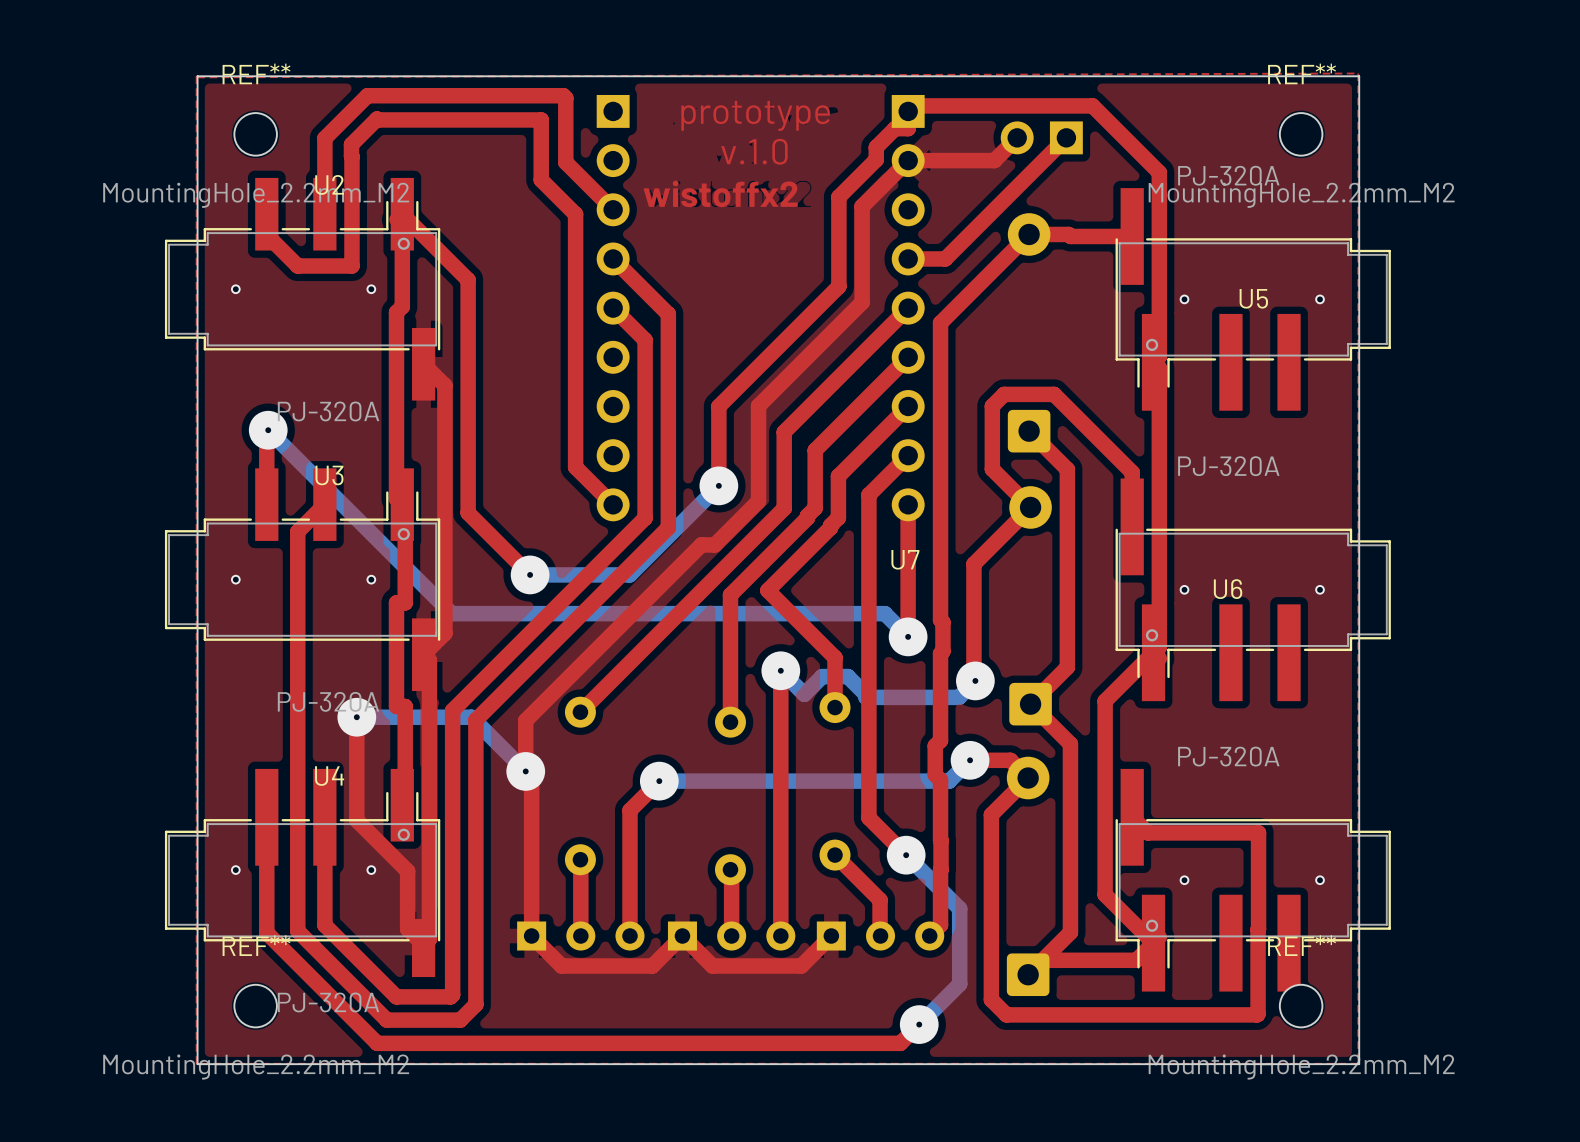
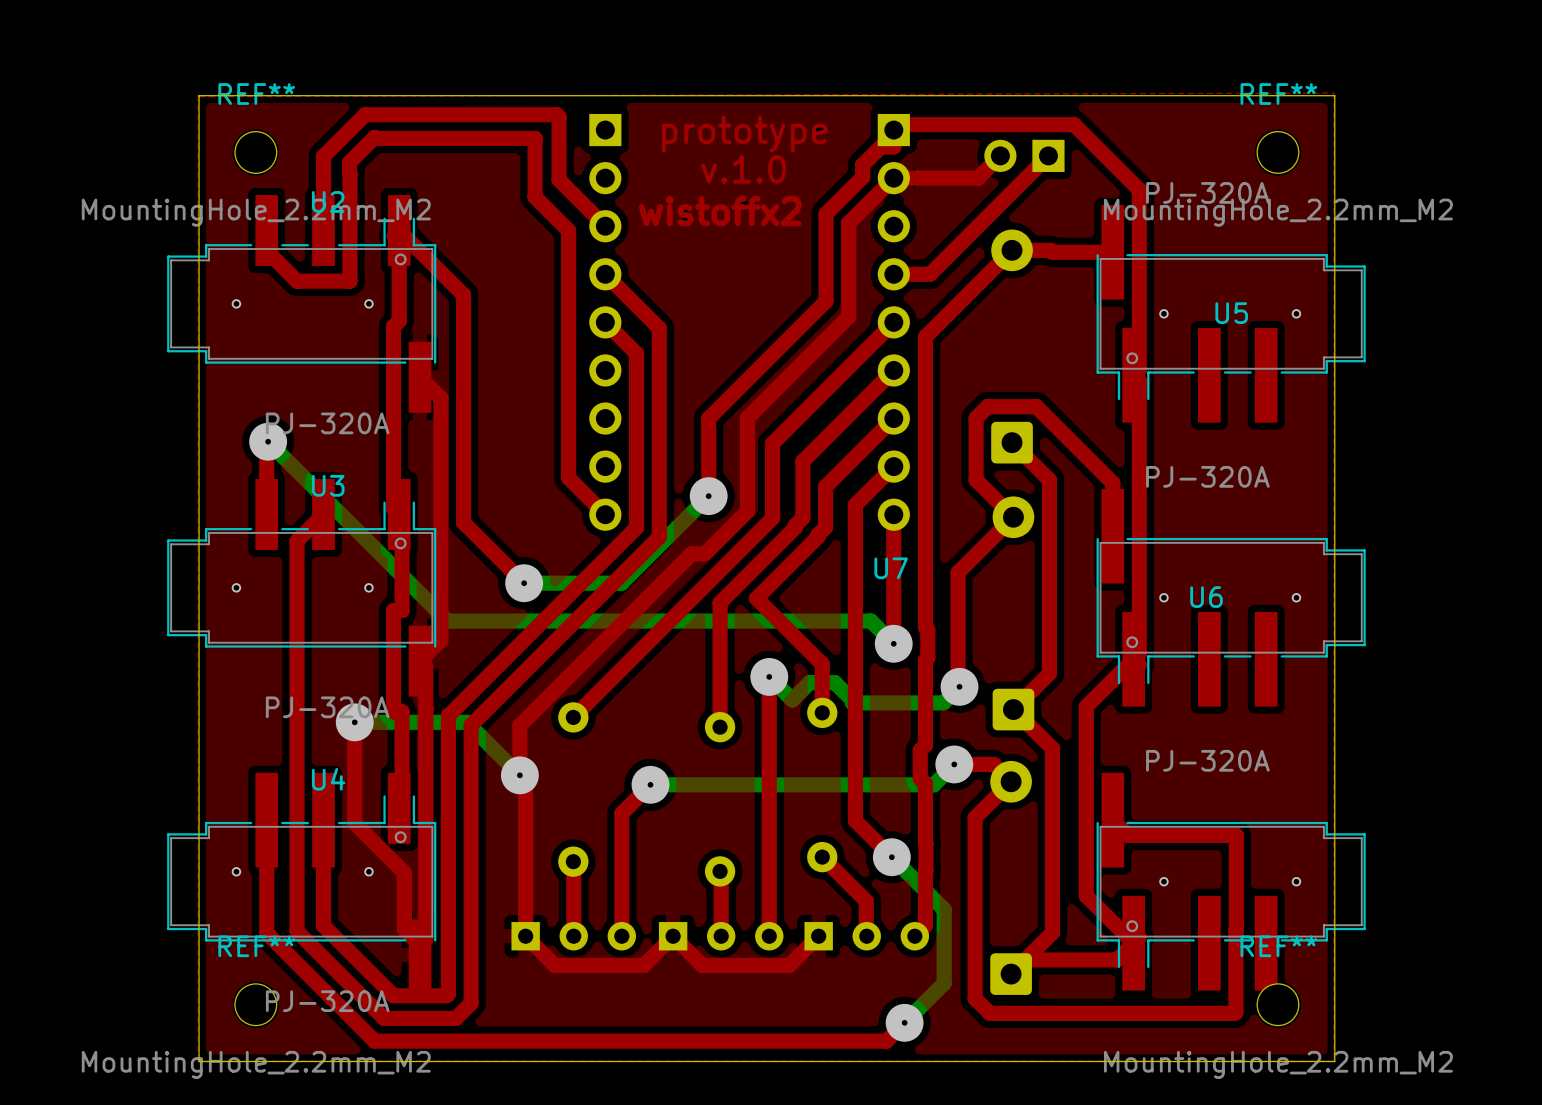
U4 footprint: [164, 768, 441, 978] -> [167, 772, 437, 991]

